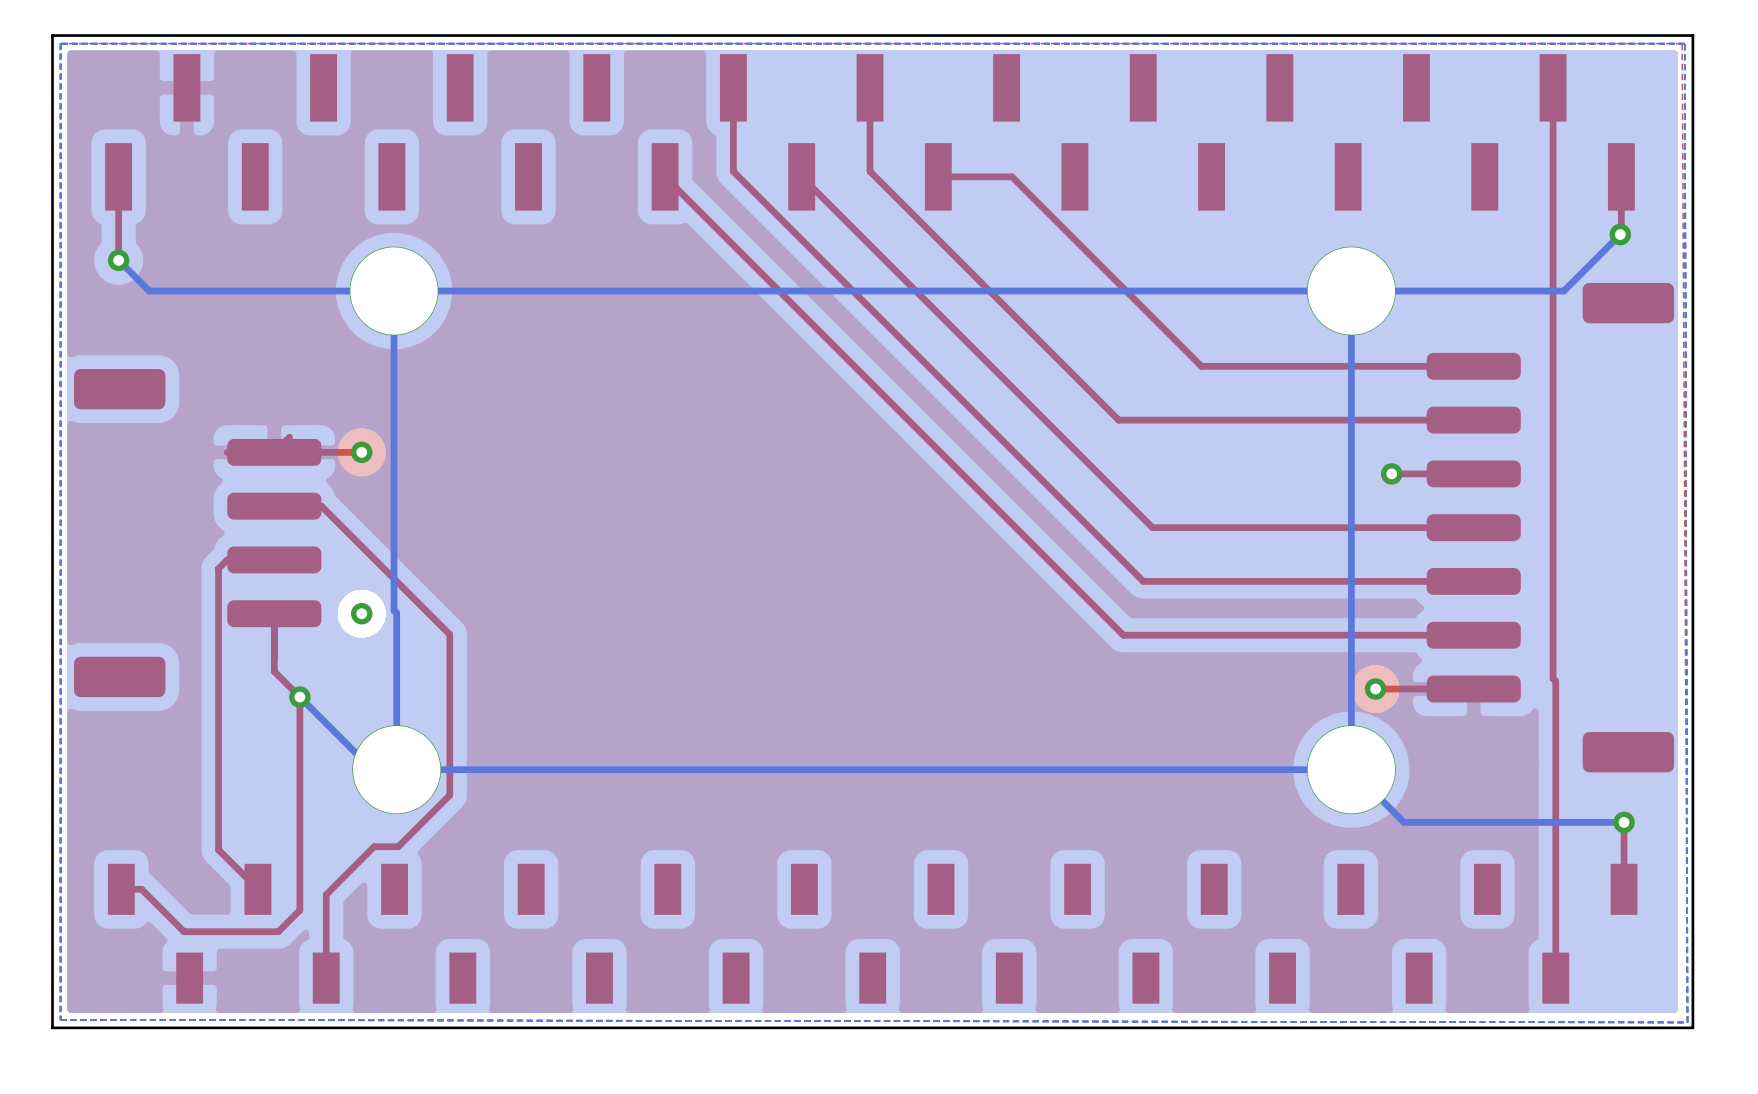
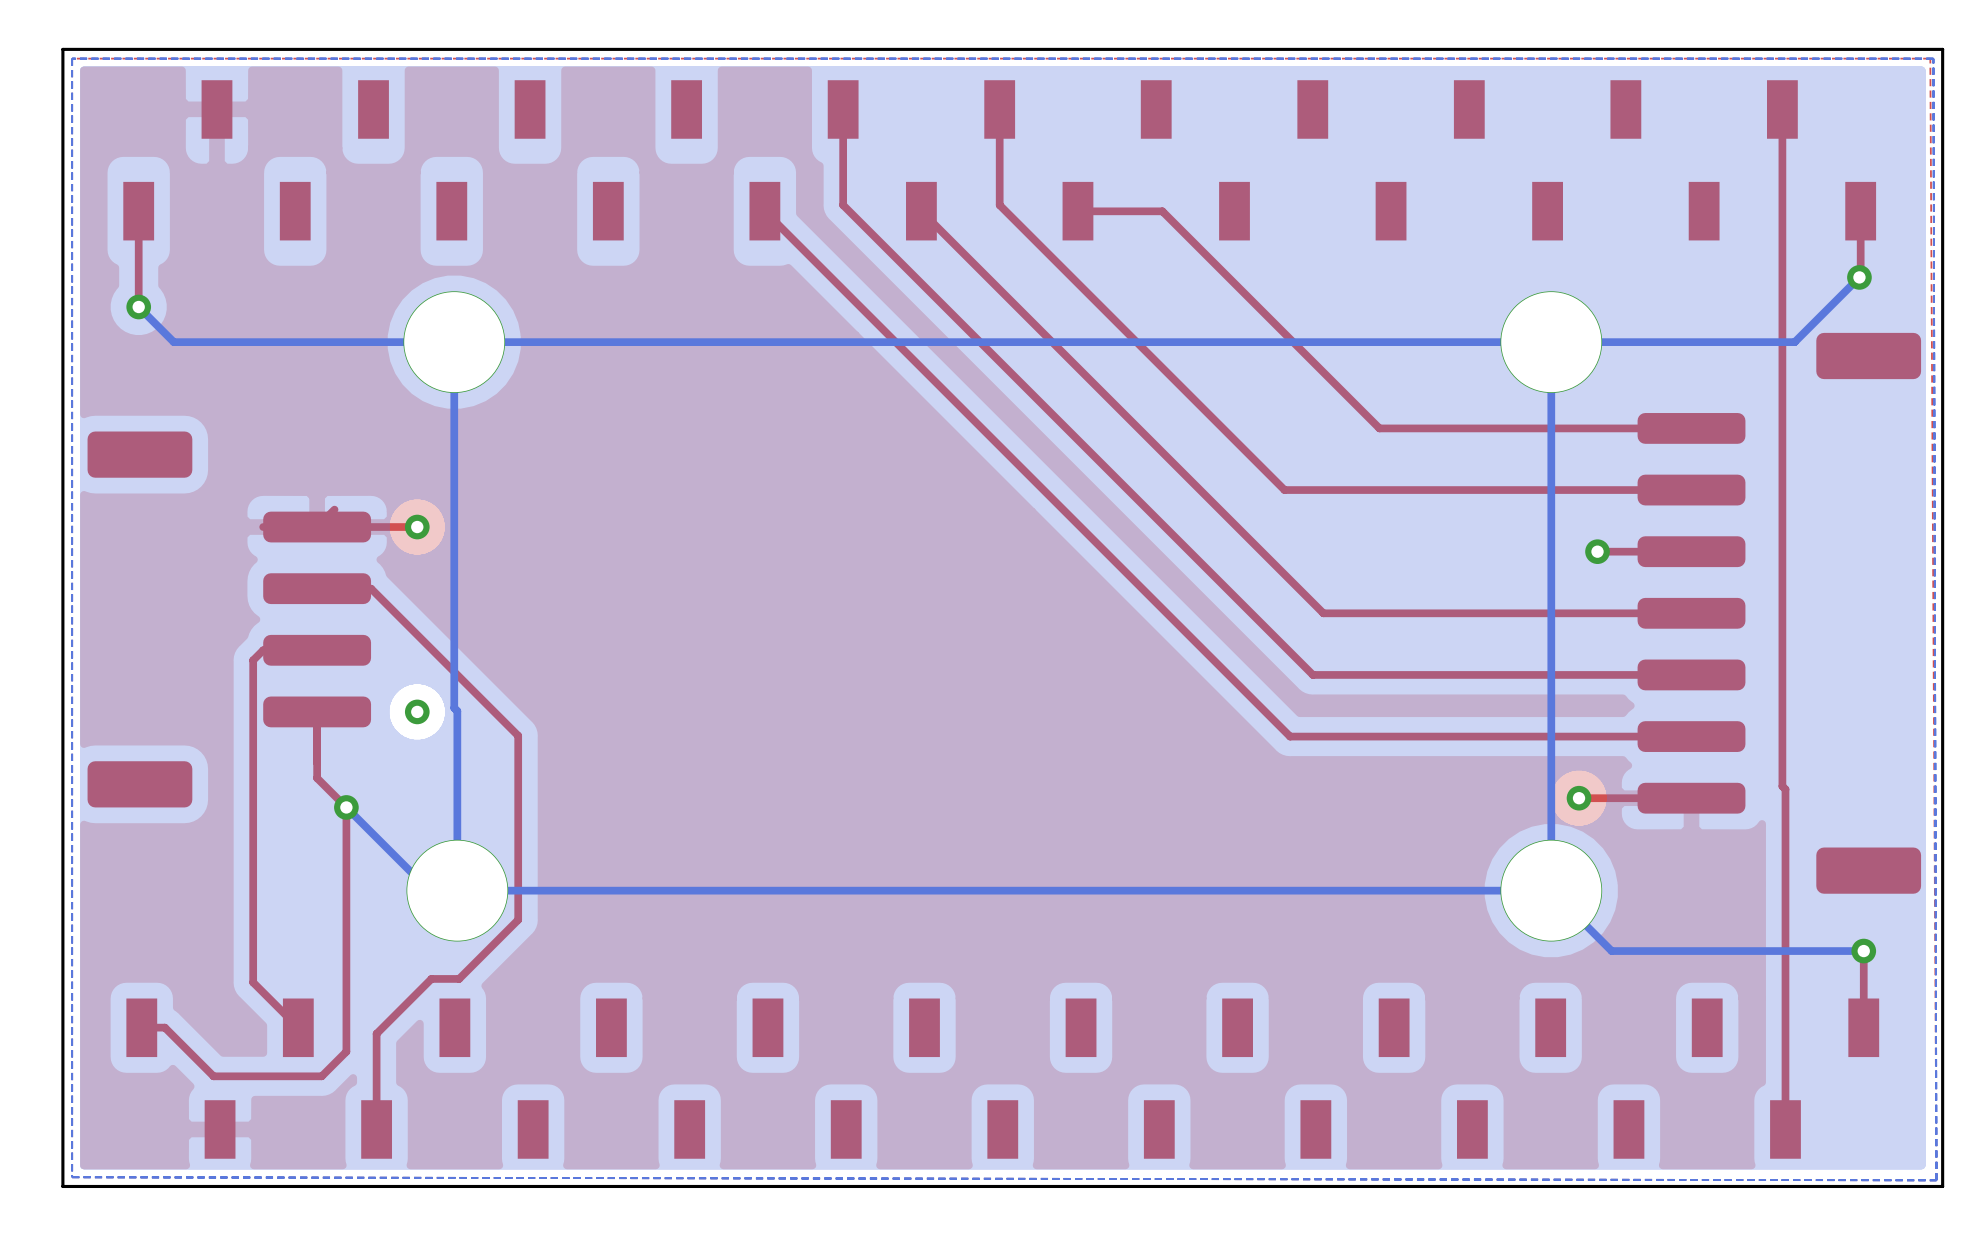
part footprint: [105, 54, 1635, 211] -> [123, 80, 1877, 241]

